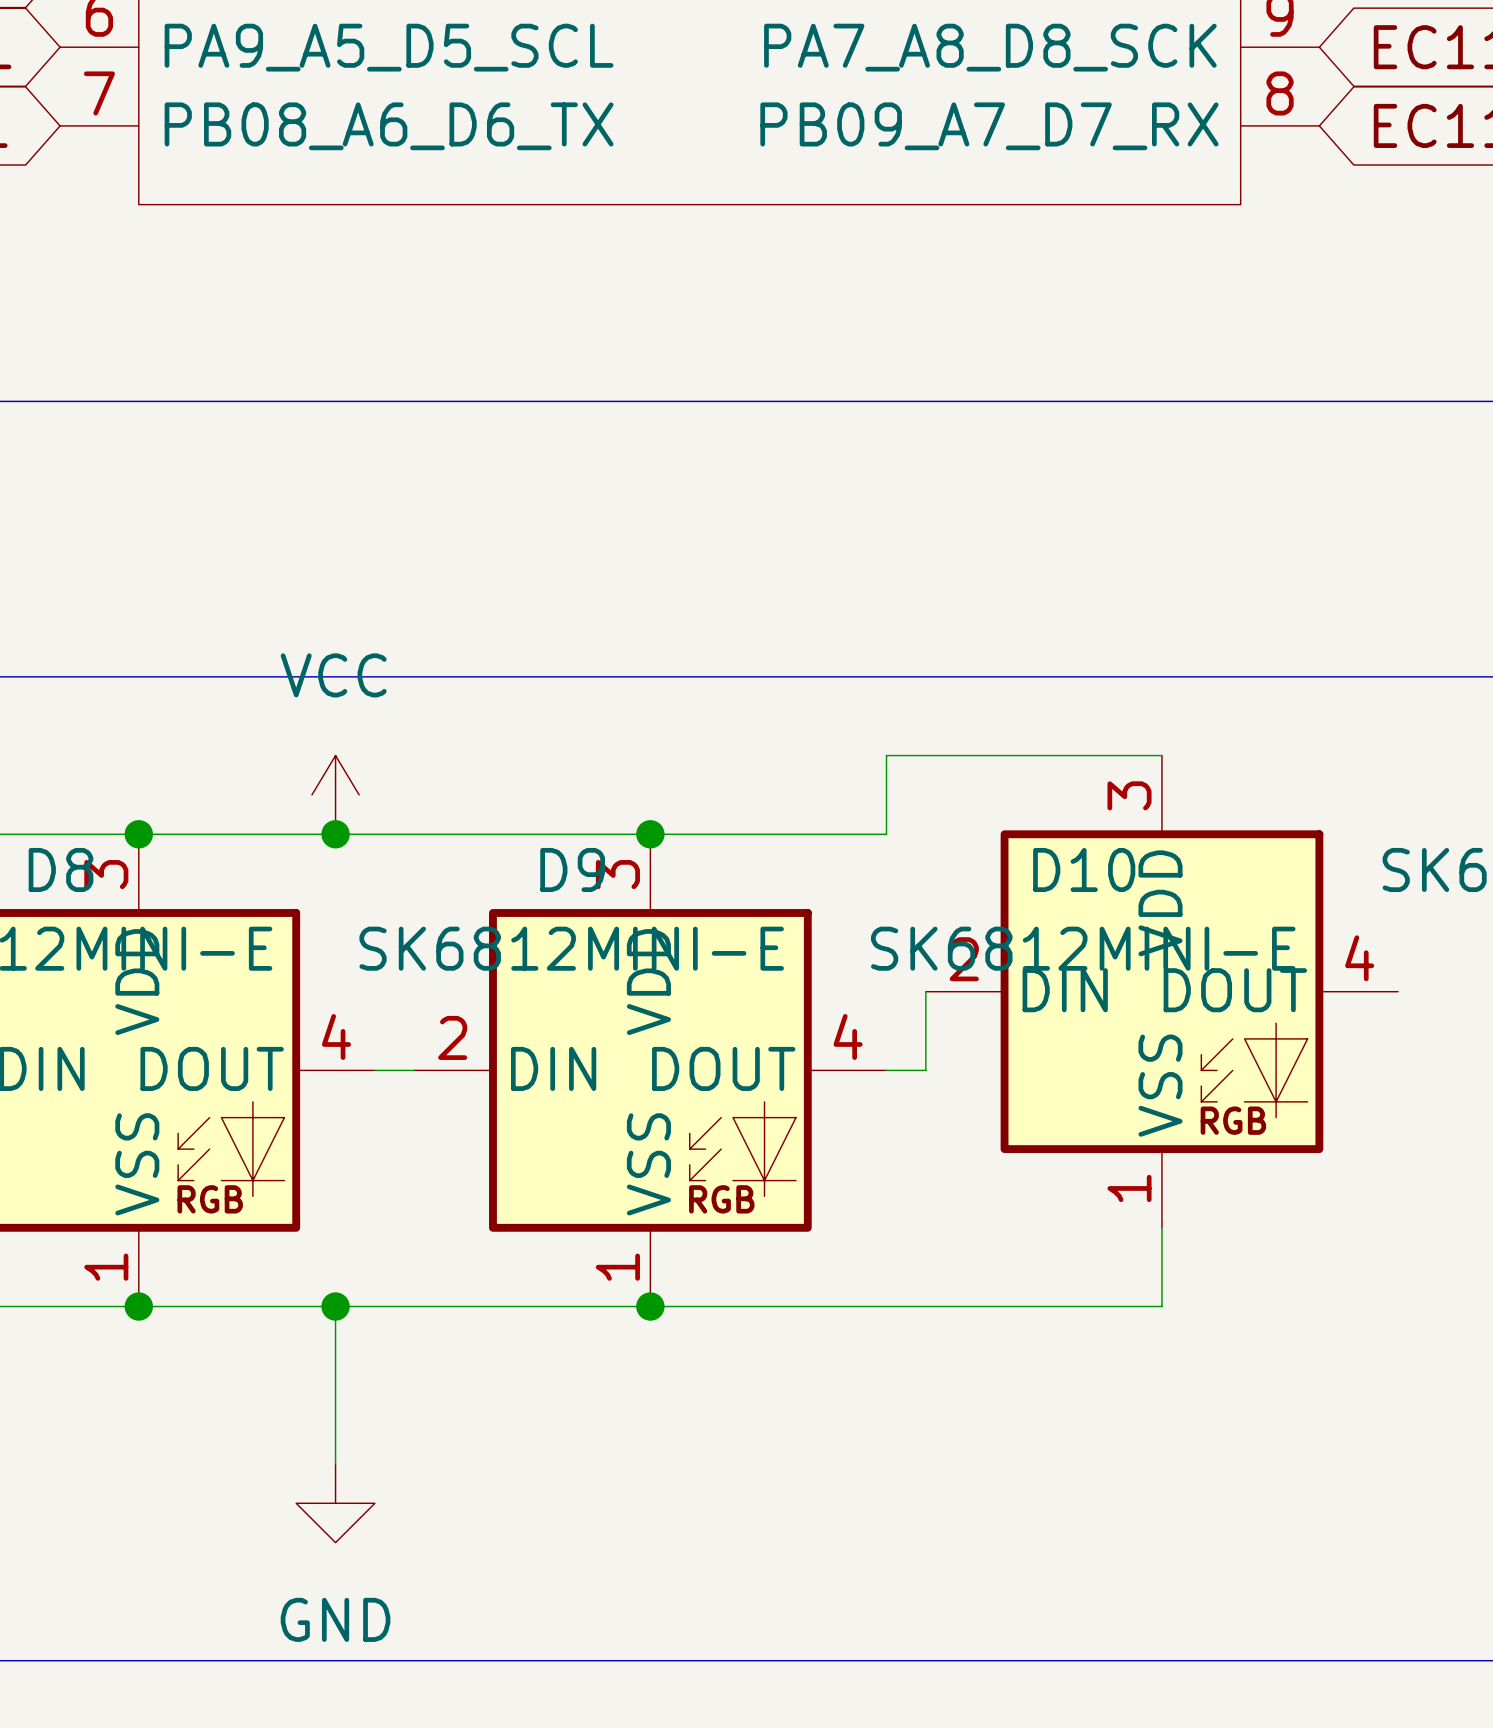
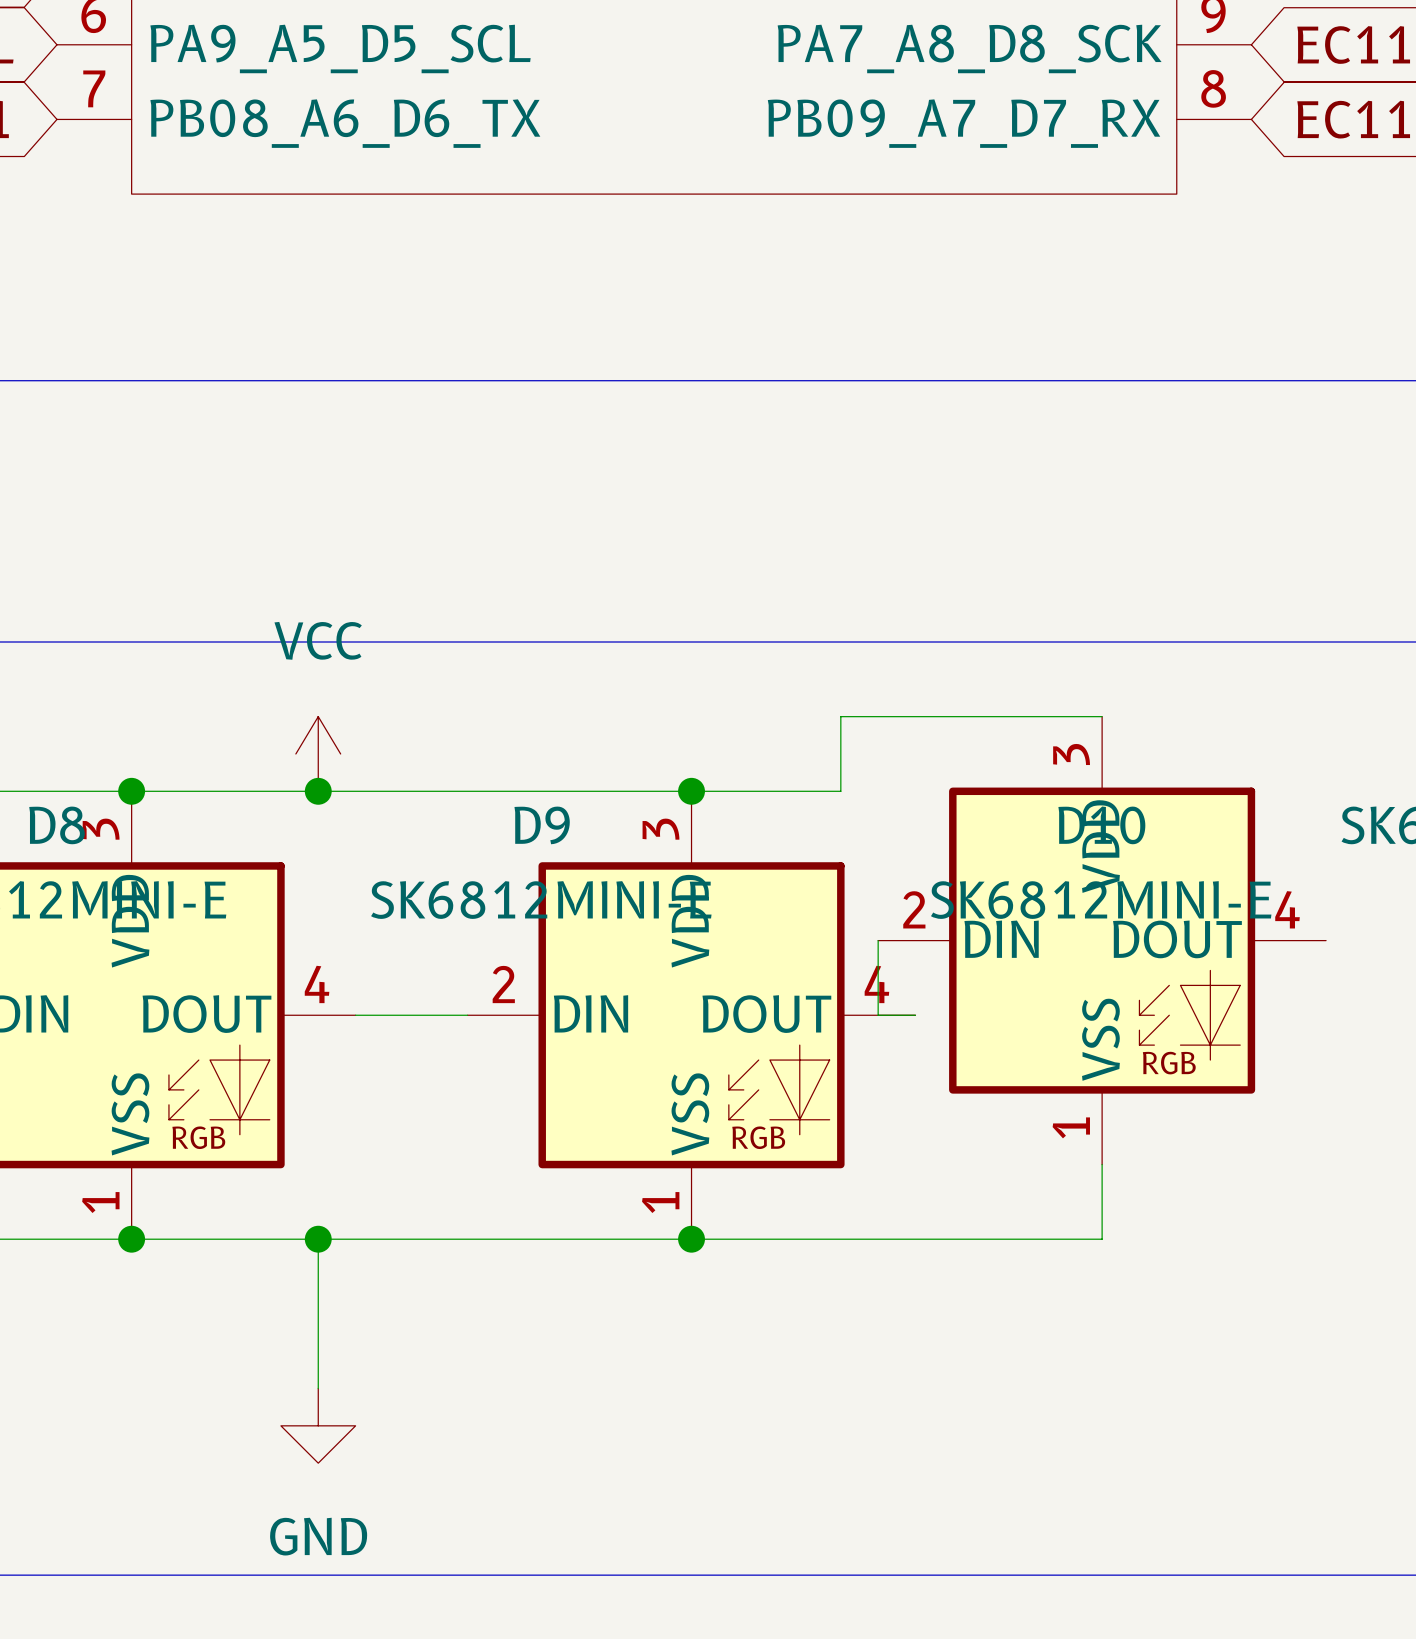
junction position: (650, 834) -> (691, 791)
D10 position: (650, 1070) -> (691, 1015)
junction position: (650, 1306) -> (691, 1239)

